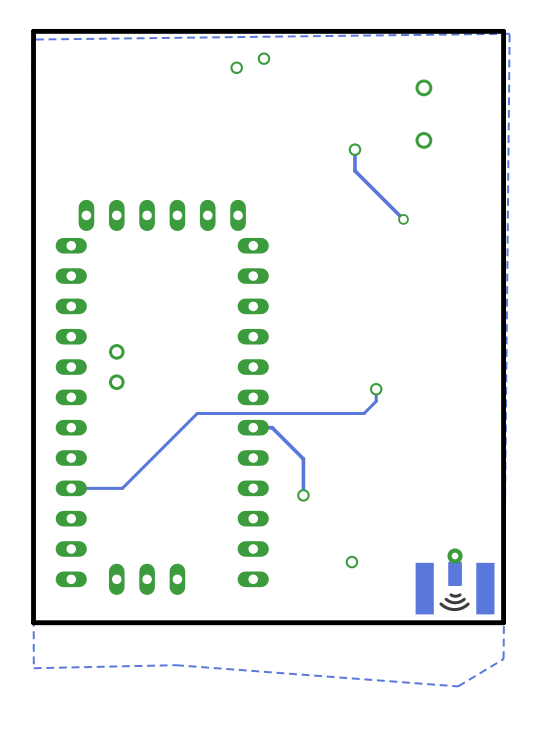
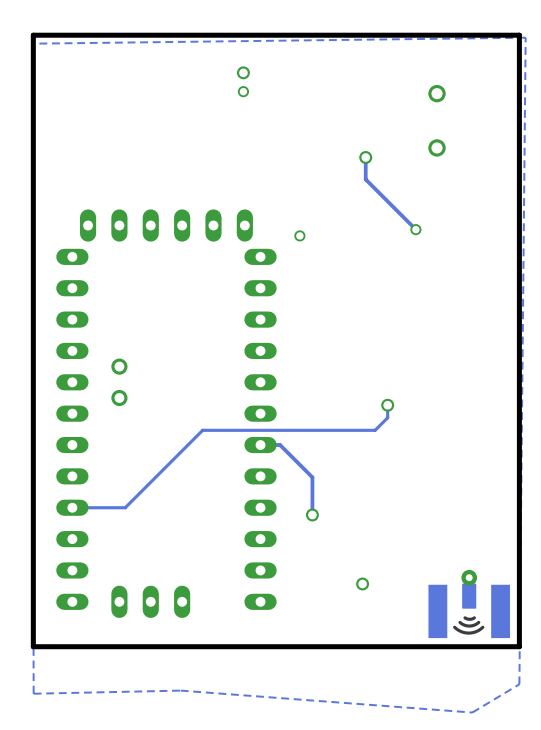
via: (263, 58) -> none
via: none -> (243, 91)
via: none -> (299, 235)

